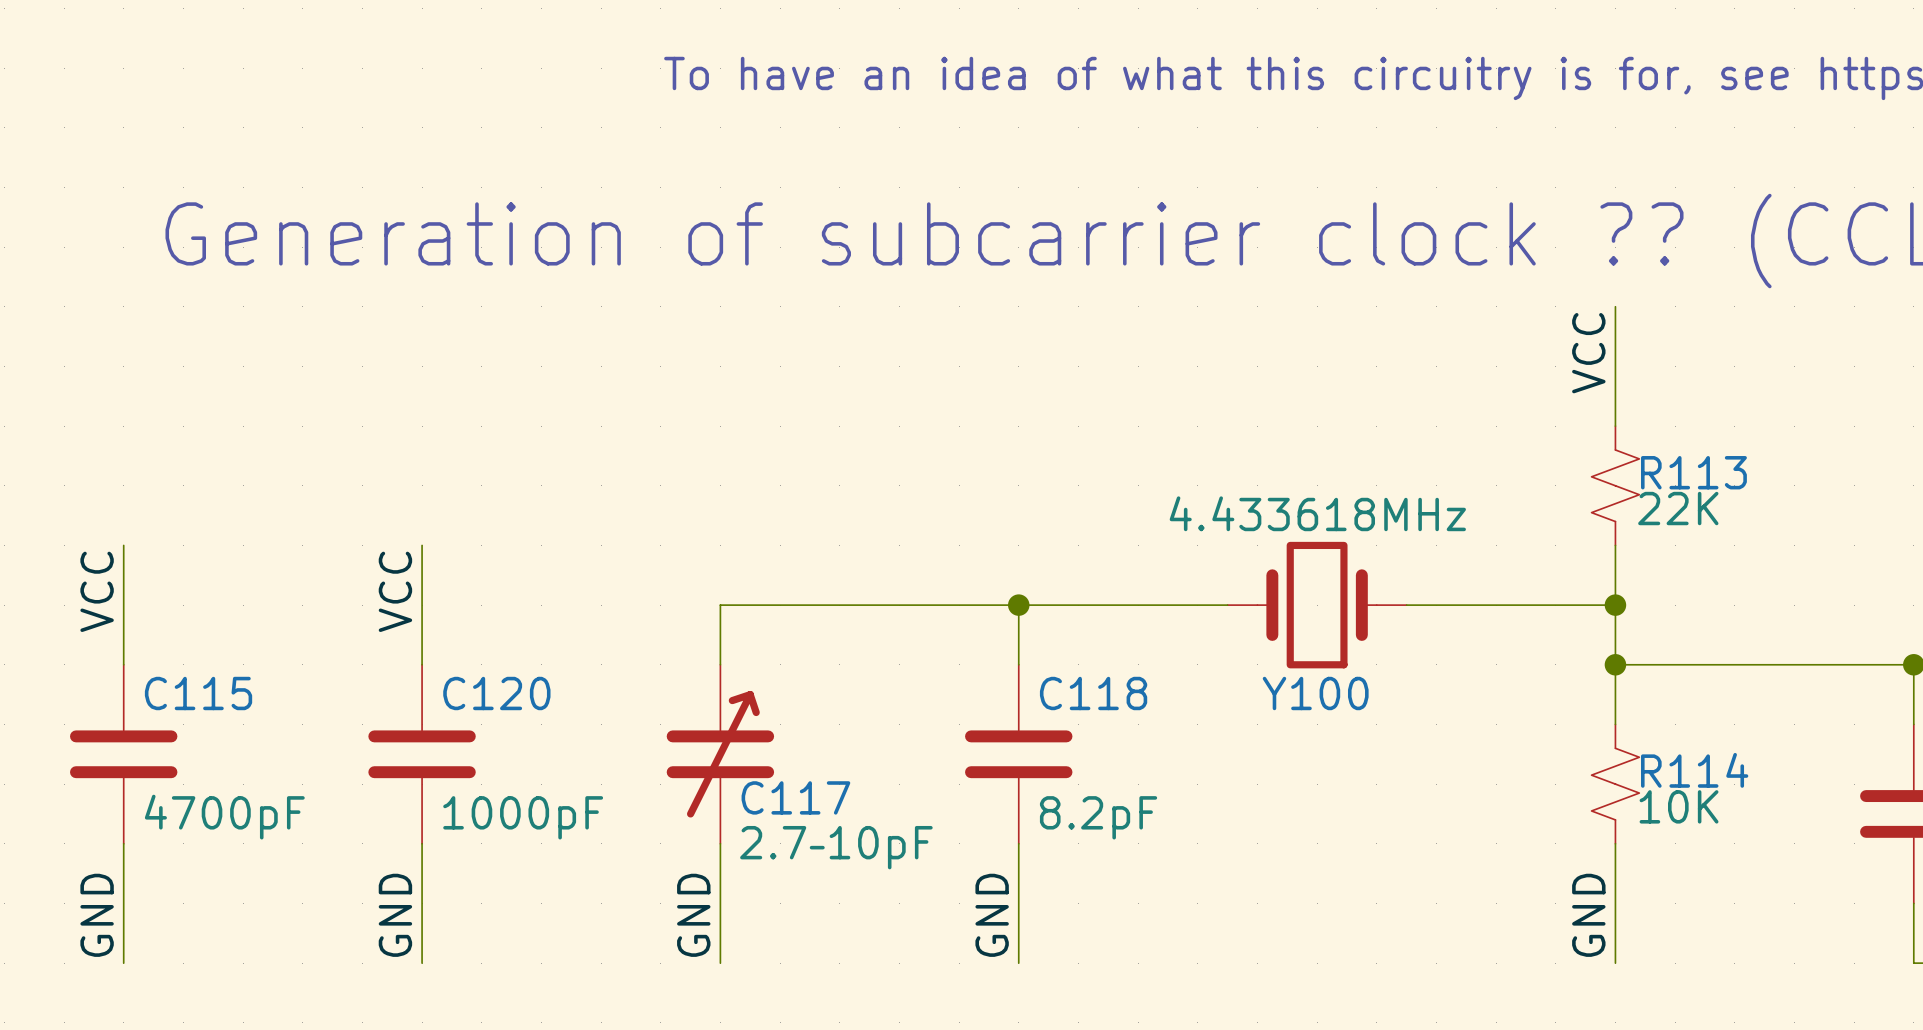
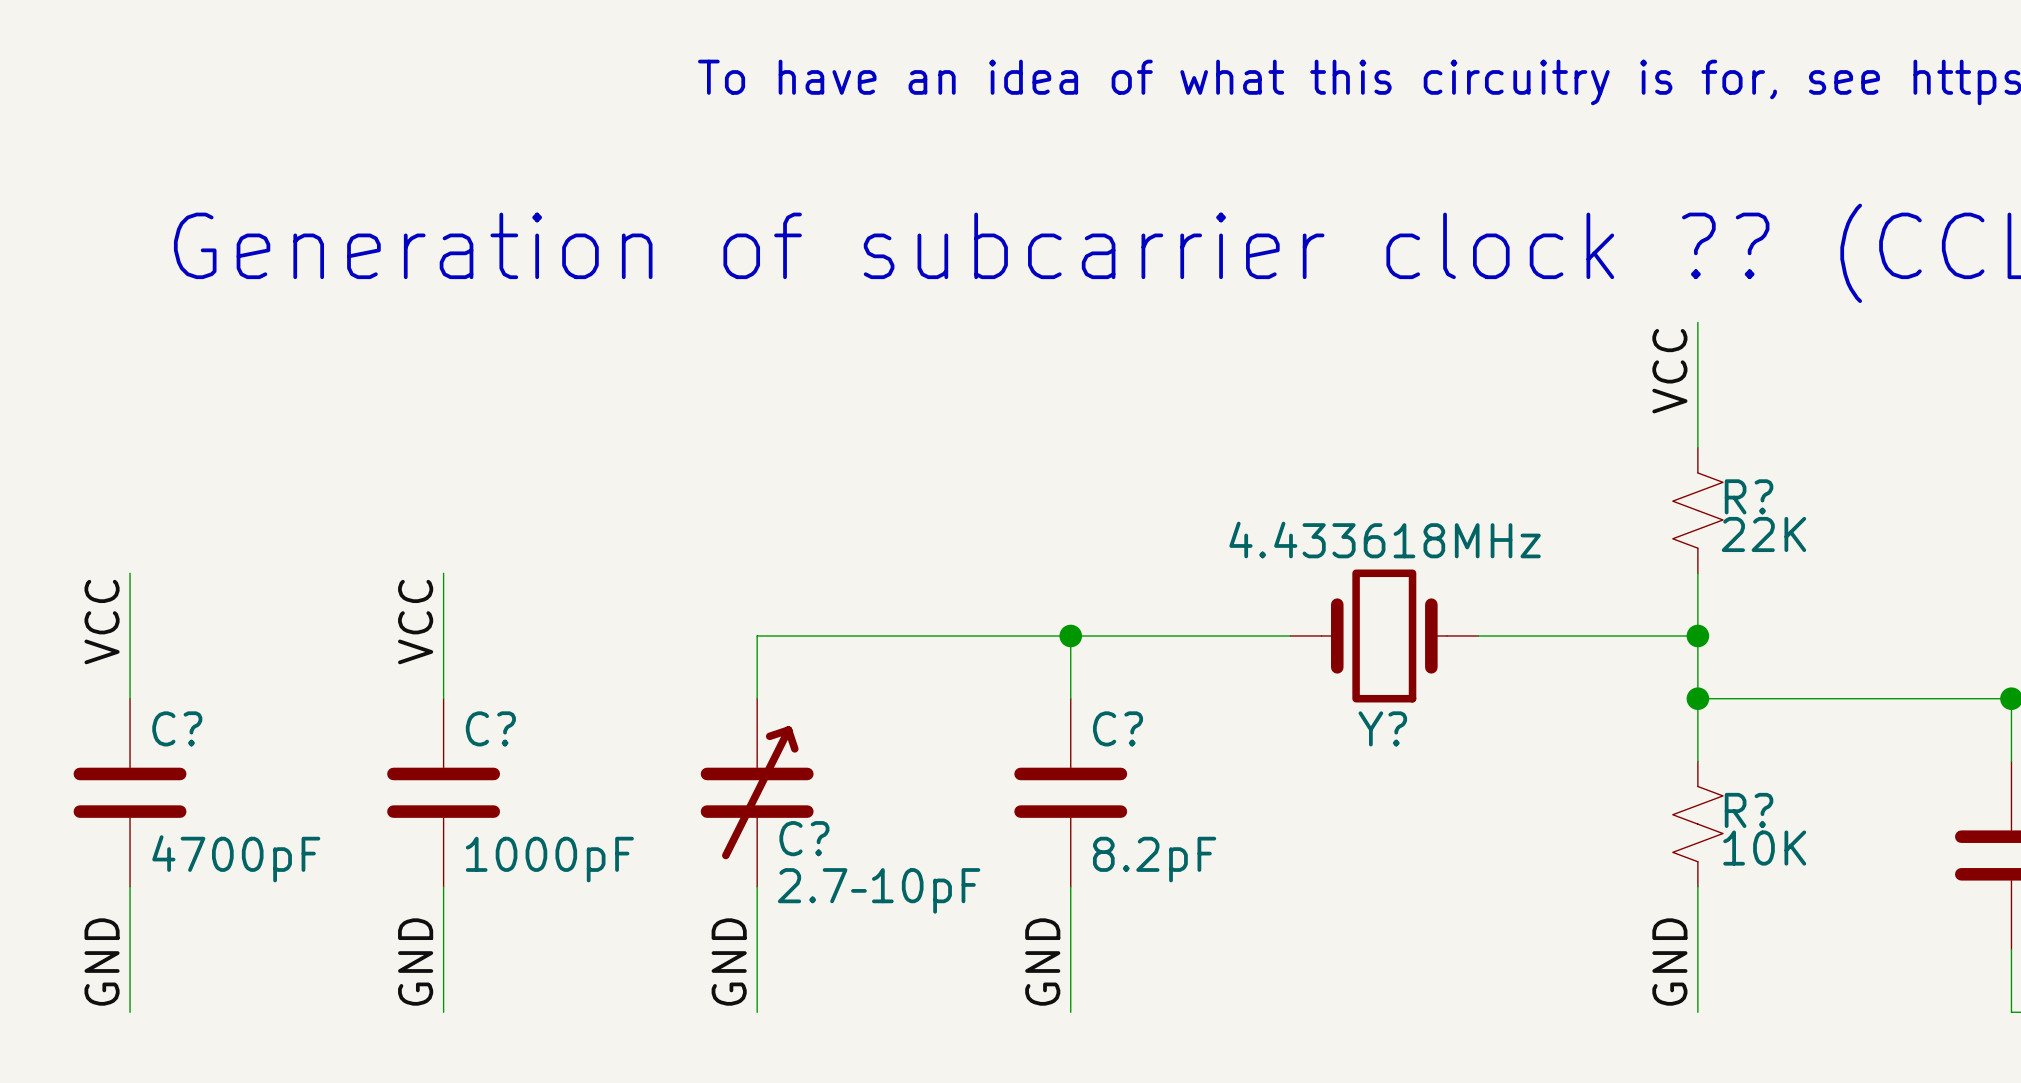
R113 name: R113 (1693, 472) -> R? (1749, 496)
C115 name: C115 (198, 693) -> C? (177, 728)
C120 name: C120 (496, 693) -> C? (490, 728)
C118 name: C118 (1093, 693) -> C? (1118, 728)
Y100 name: Y100 (1315, 693) -> Y? (1382, 728)
R114 name: R114 (1694, 770) -> R? (1749, 810)
C117 name: C117 (795, 797) -> C? (804, 838)

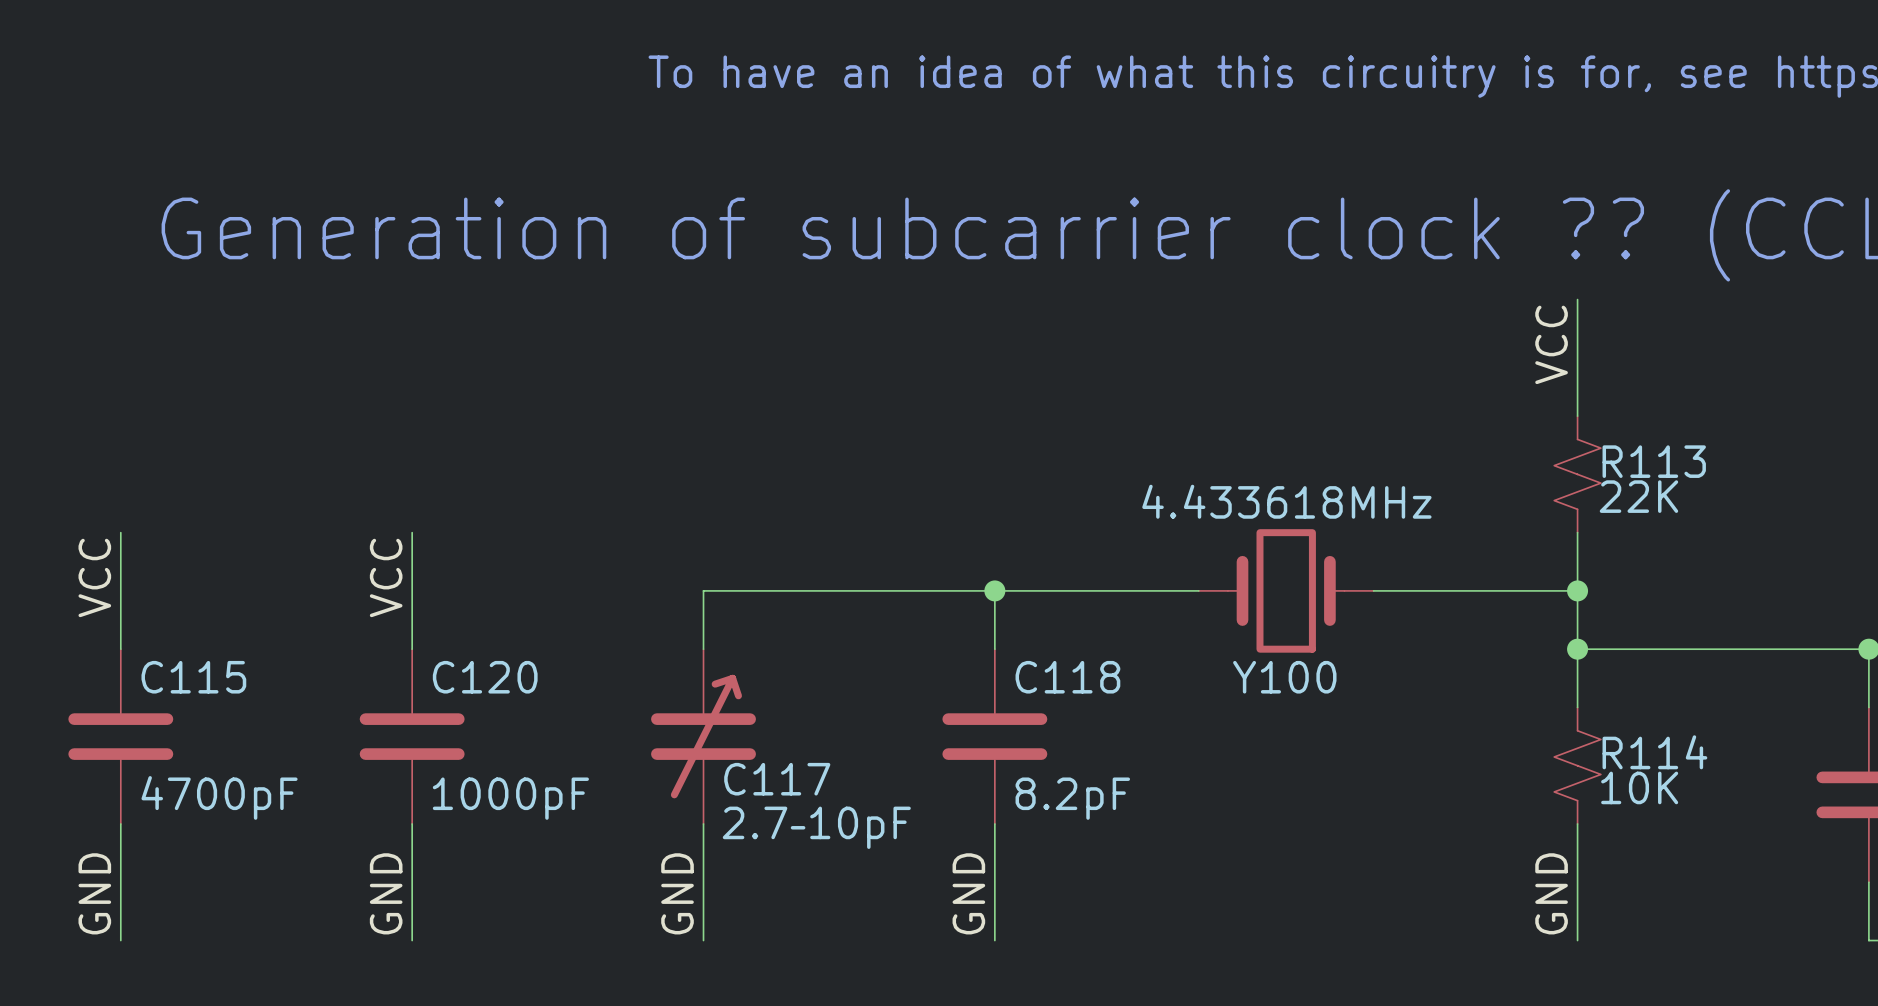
R? name: R? (1749, 496) -> R113 (1654, 461)
C? name: C? (177, 728) -> C115 (193, 677)
C? name: C? (490, 728) -> C120 (485, 677)
C? name: C? (1118, 728) -> C118 (1067, 677)
Y? name: Y? (1382, 728) -> Y100 (1284, 677)
R? name: R? (1749, 810) -> R114 (1654, 752)
C? name: C? (804, 838) -> C117 (777, 779)

